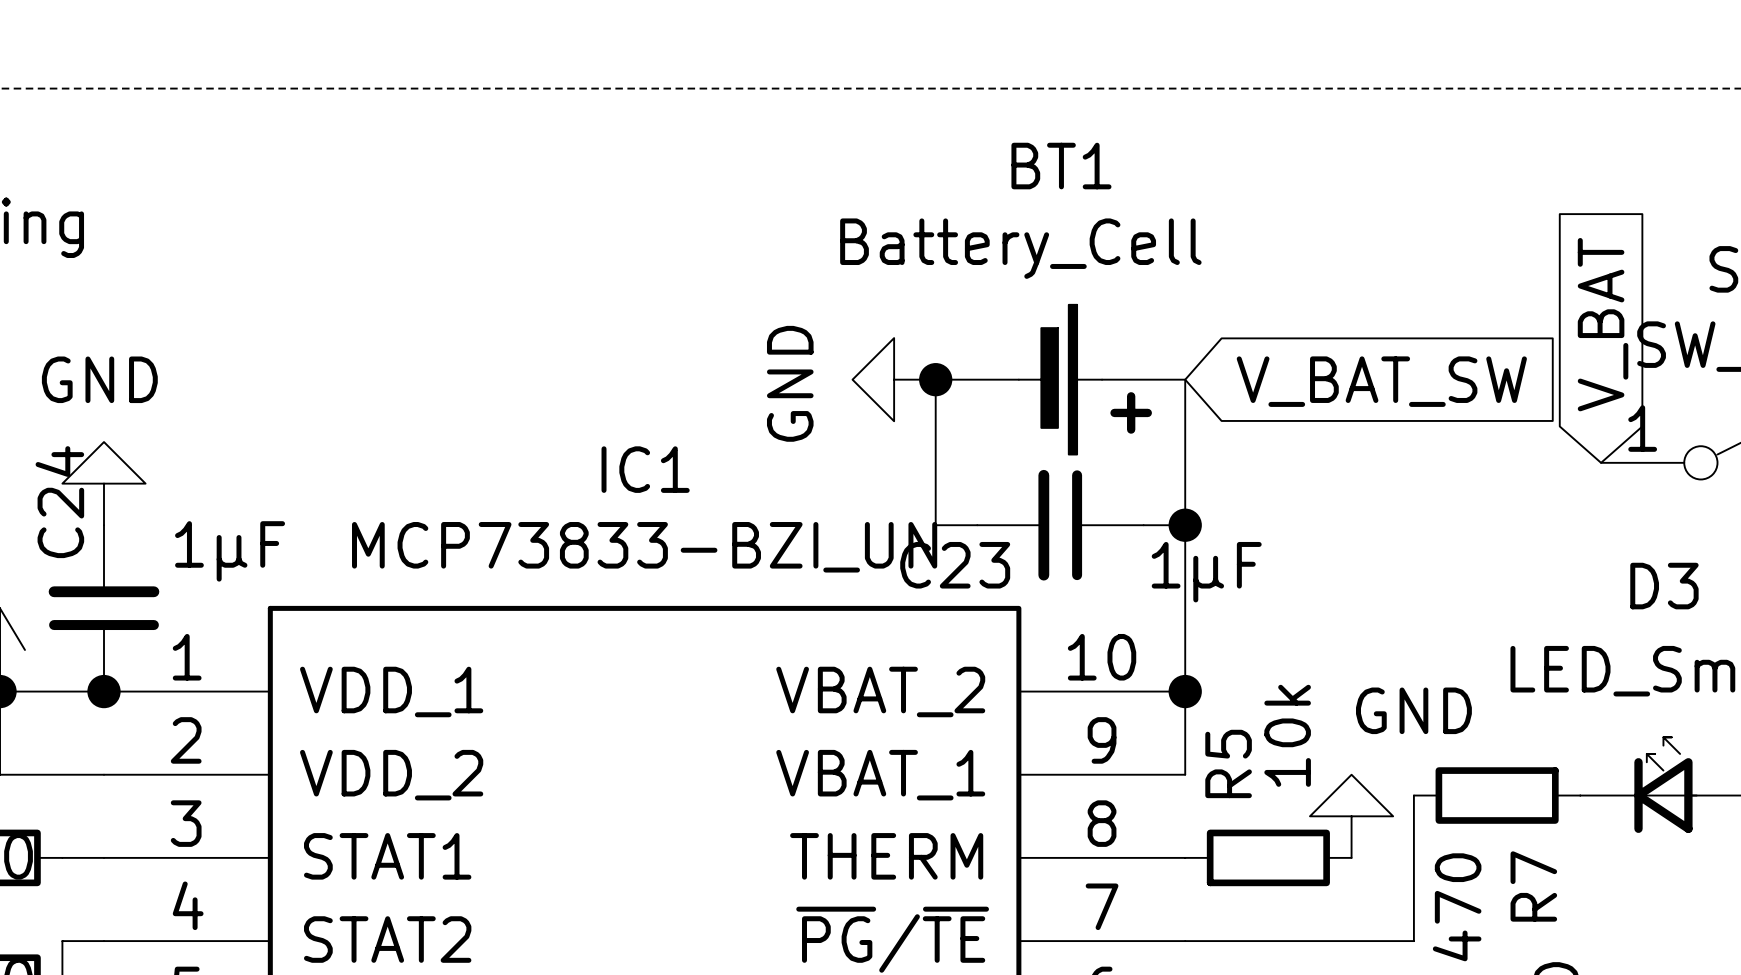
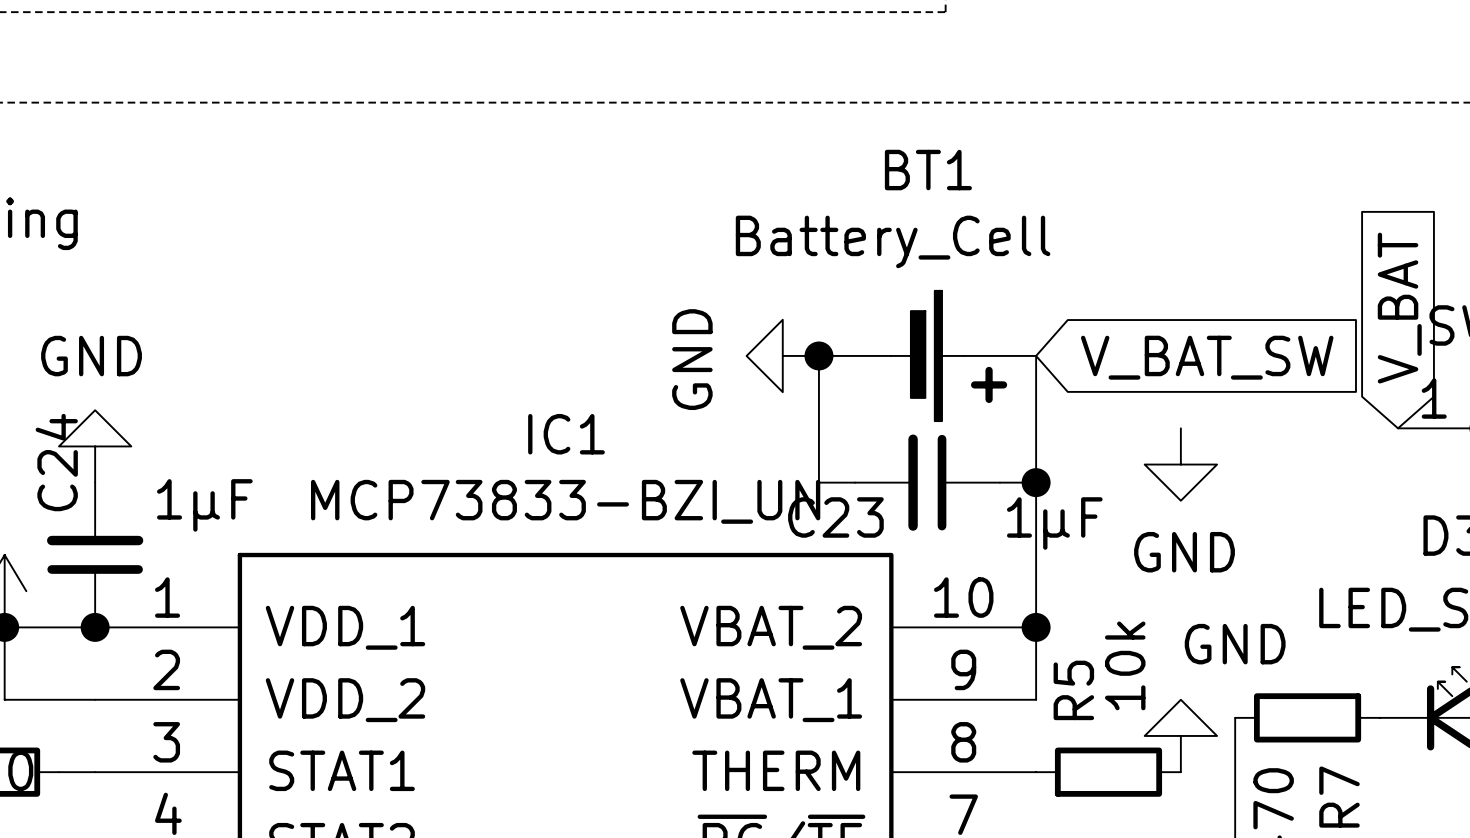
power symbol: none -> GND (1180, 464)

